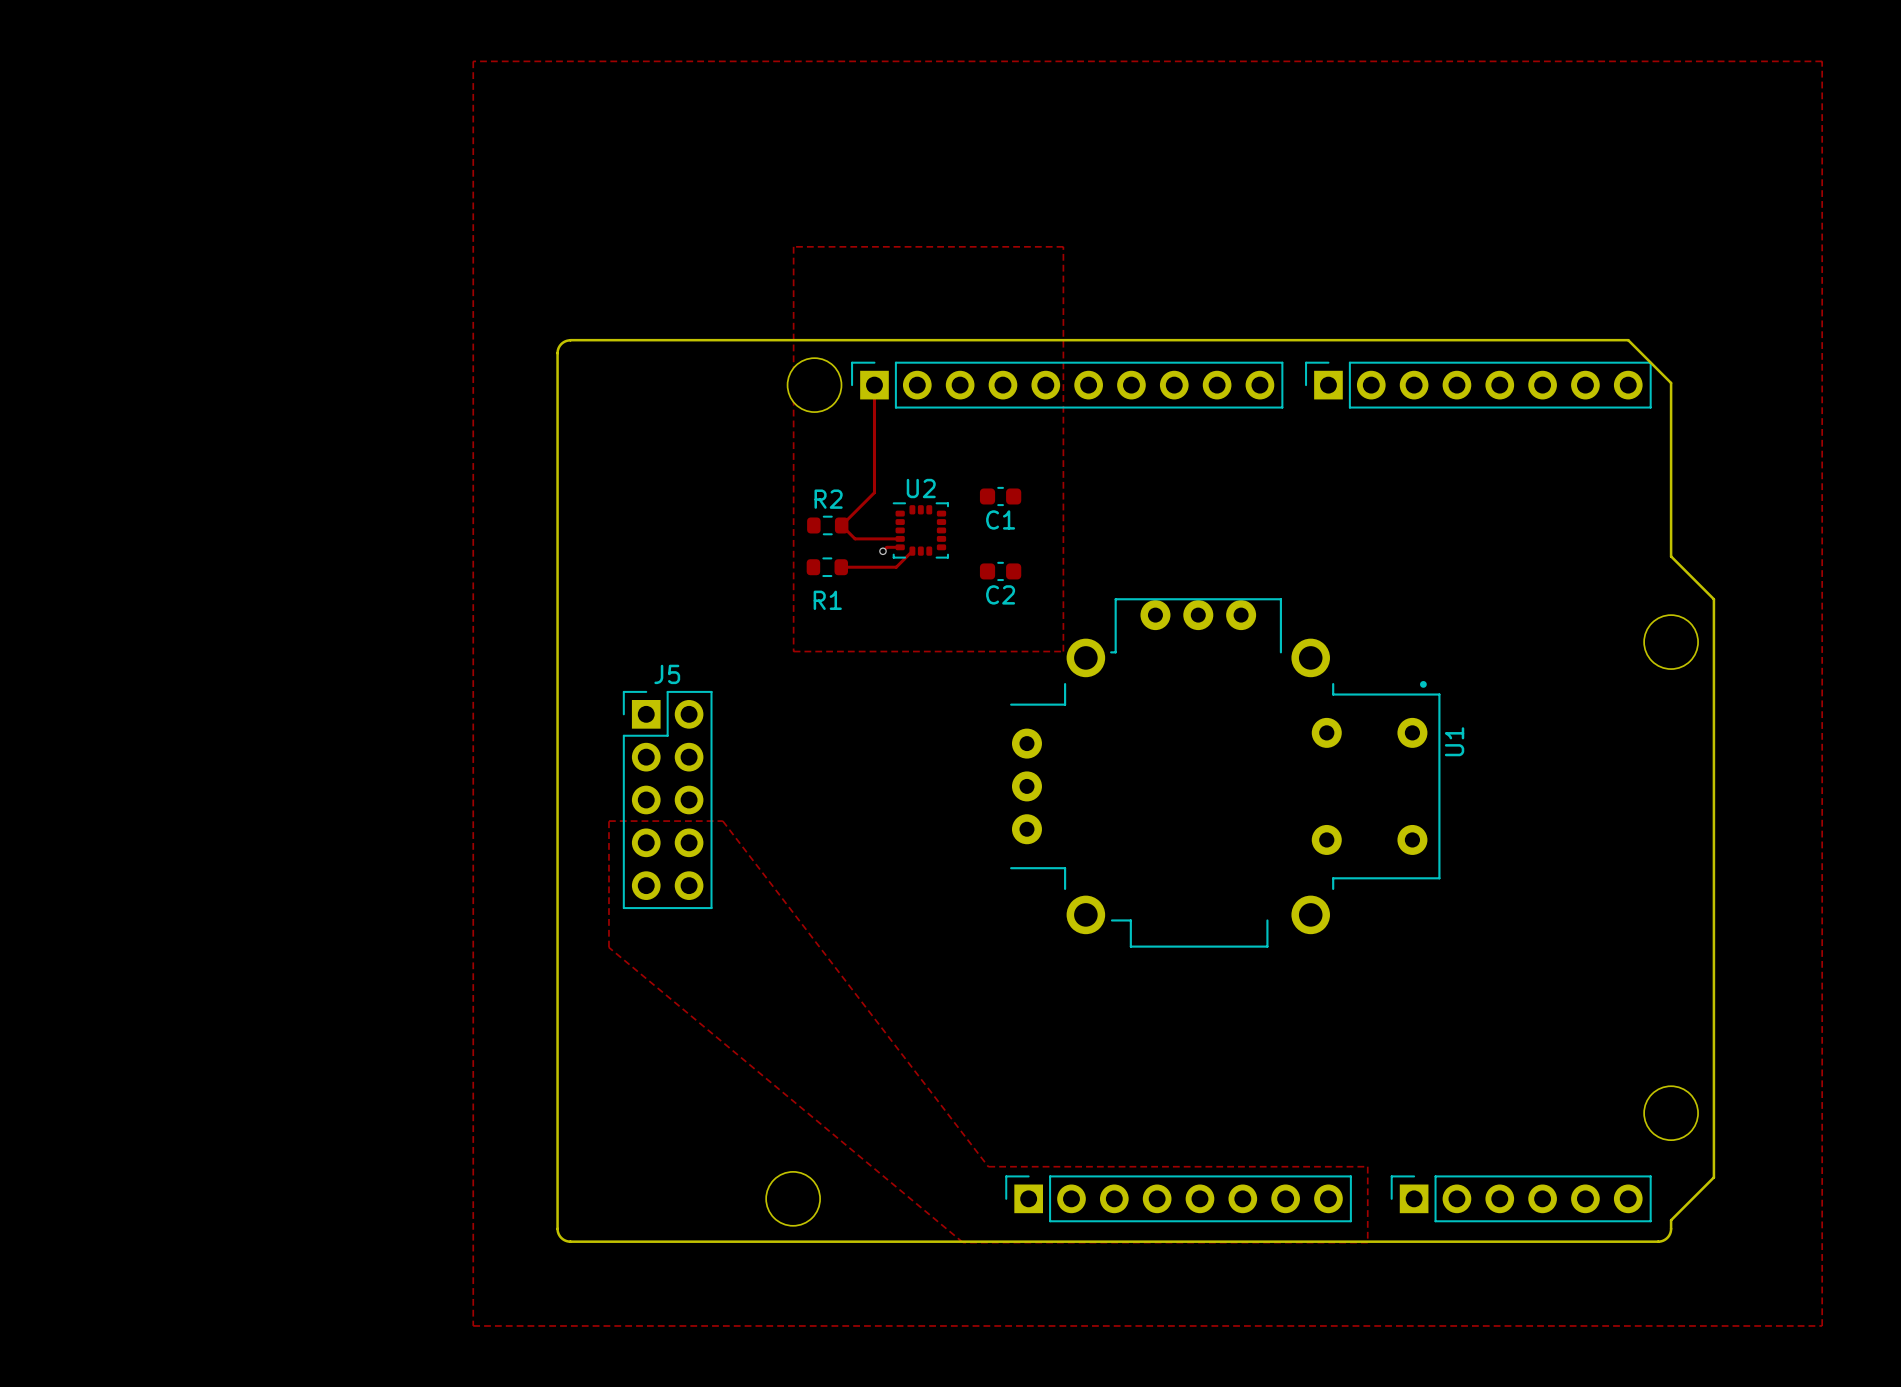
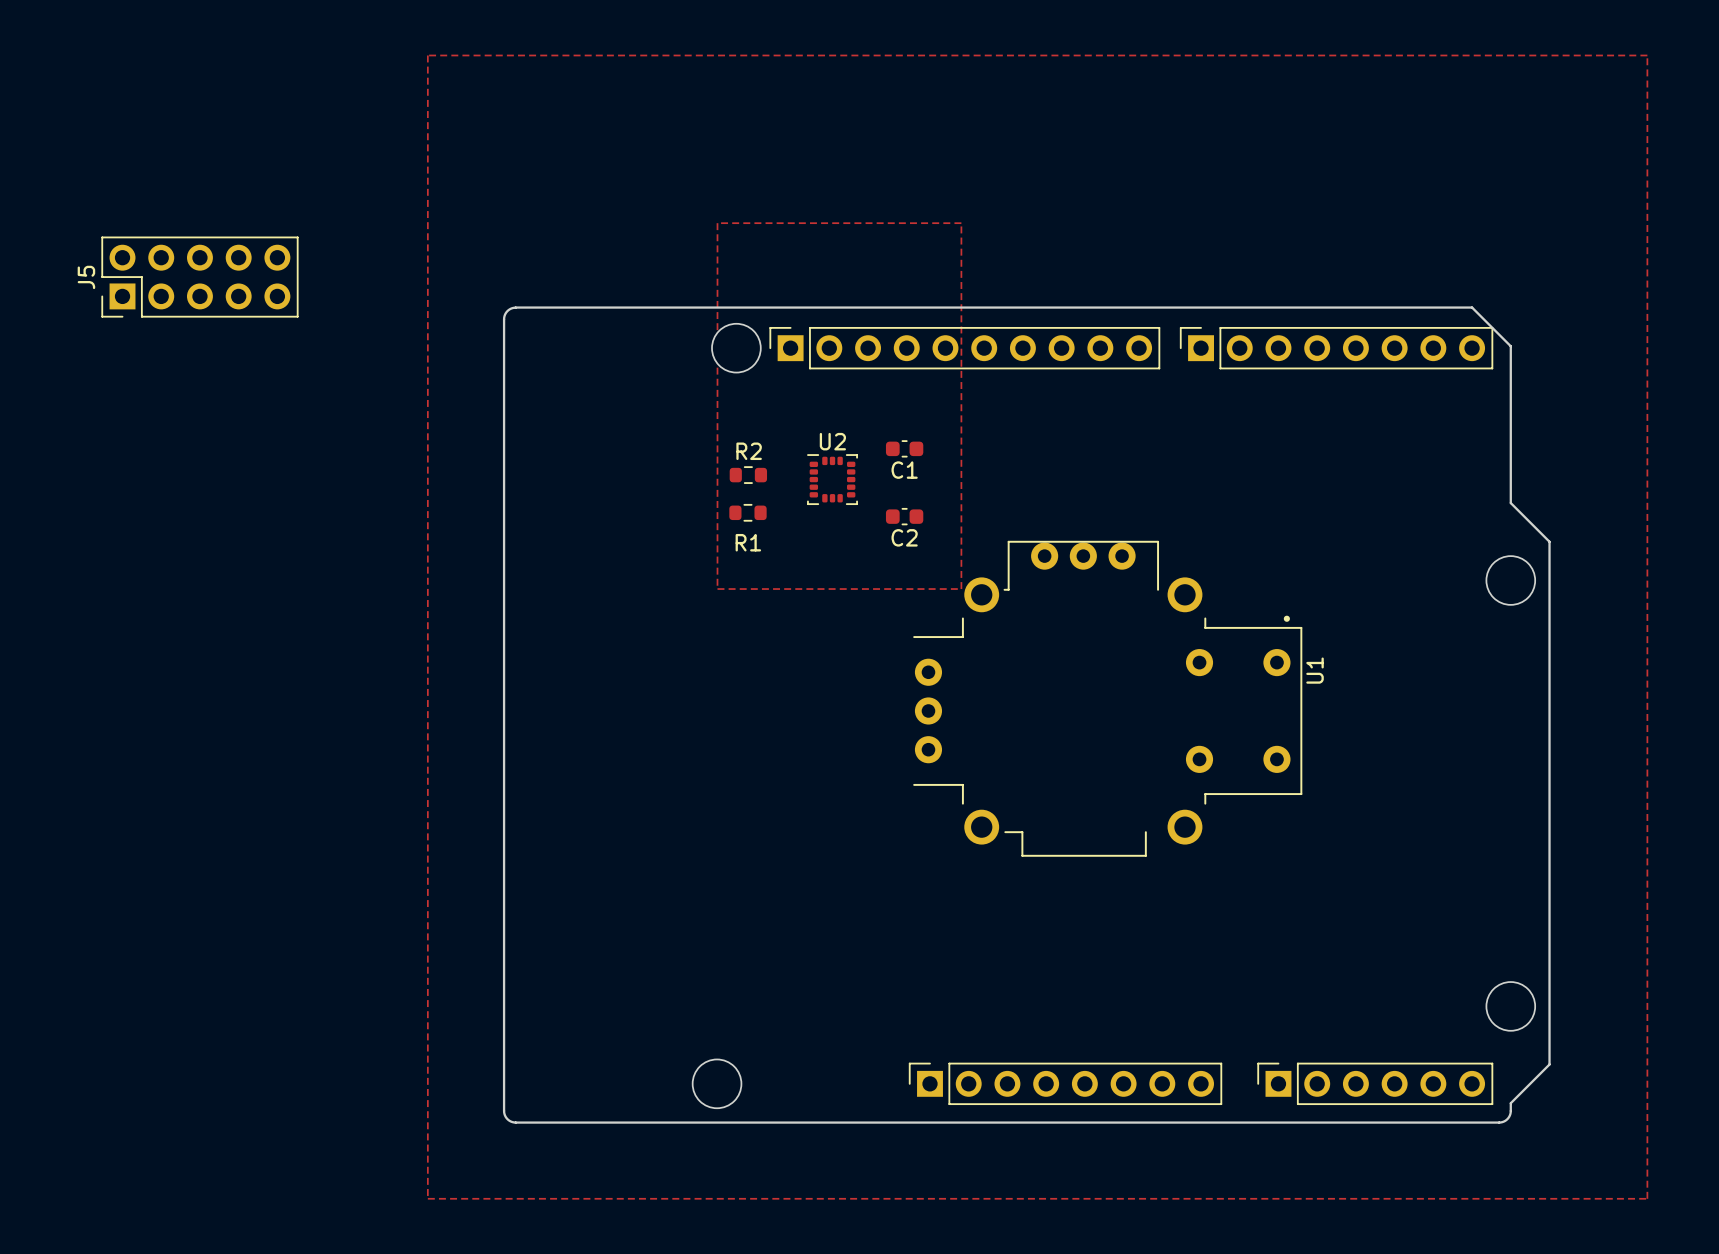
track: (874, 385) (874, 492) (841, 525) (855, 538) (900, 538) -> none
track: (900, 547) (886, 547) (882, 551) -> none
via: (882, 551) -> none
track: (912, 551) (896, 567) (841, 567) -> none
J5 rotation: 0° (667, 799) -> 90° counterclockwise (199, 277)
J5 position: (667, 799) -> (199, 277)
zone outline: (608, 821) (722, 821) (988, 1166) (1367, 1166) (1367, 1242) (963, 1242) (608, 947) (608, 821) -> none

